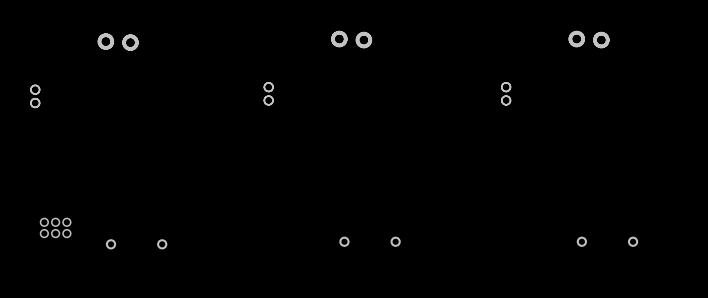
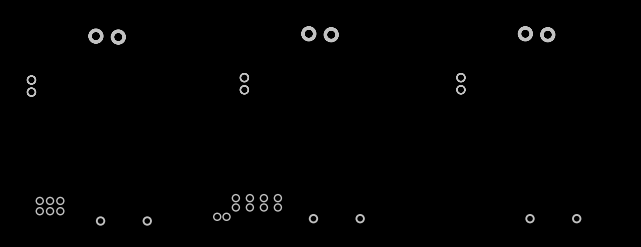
via: none -> (235, 198)
via: none -> (249, 198)
via: none -> (263, 198)
via: none -> (277, 198)
via: none -> (235, 207)
via: none -> (249, 207)
via: none -> (263, 207)
via: none -> (277, 207)
via: none -> (217, 216)
via: none -> (226, 216)

